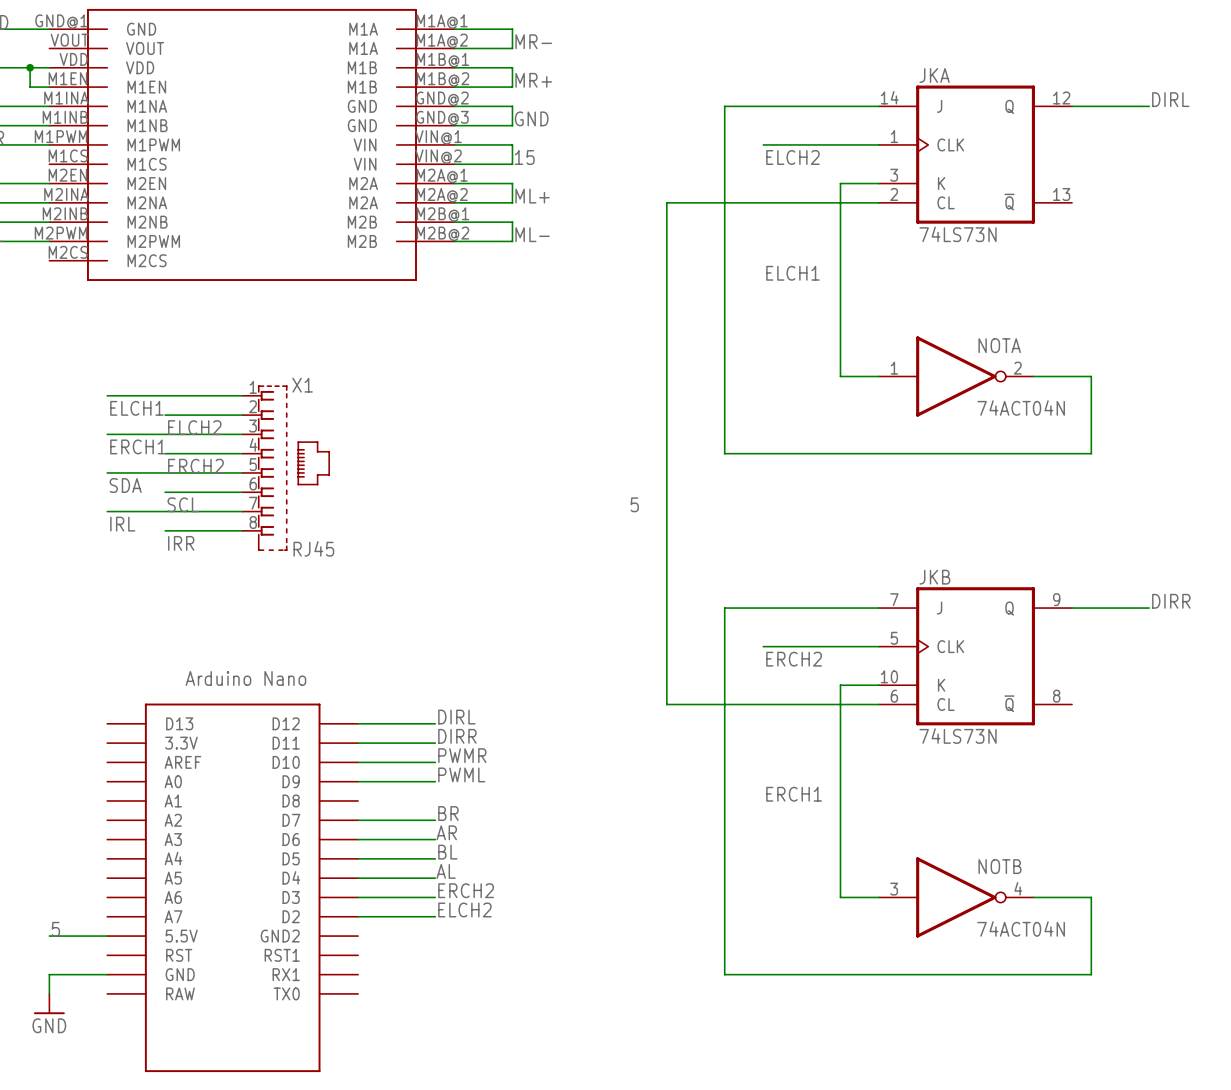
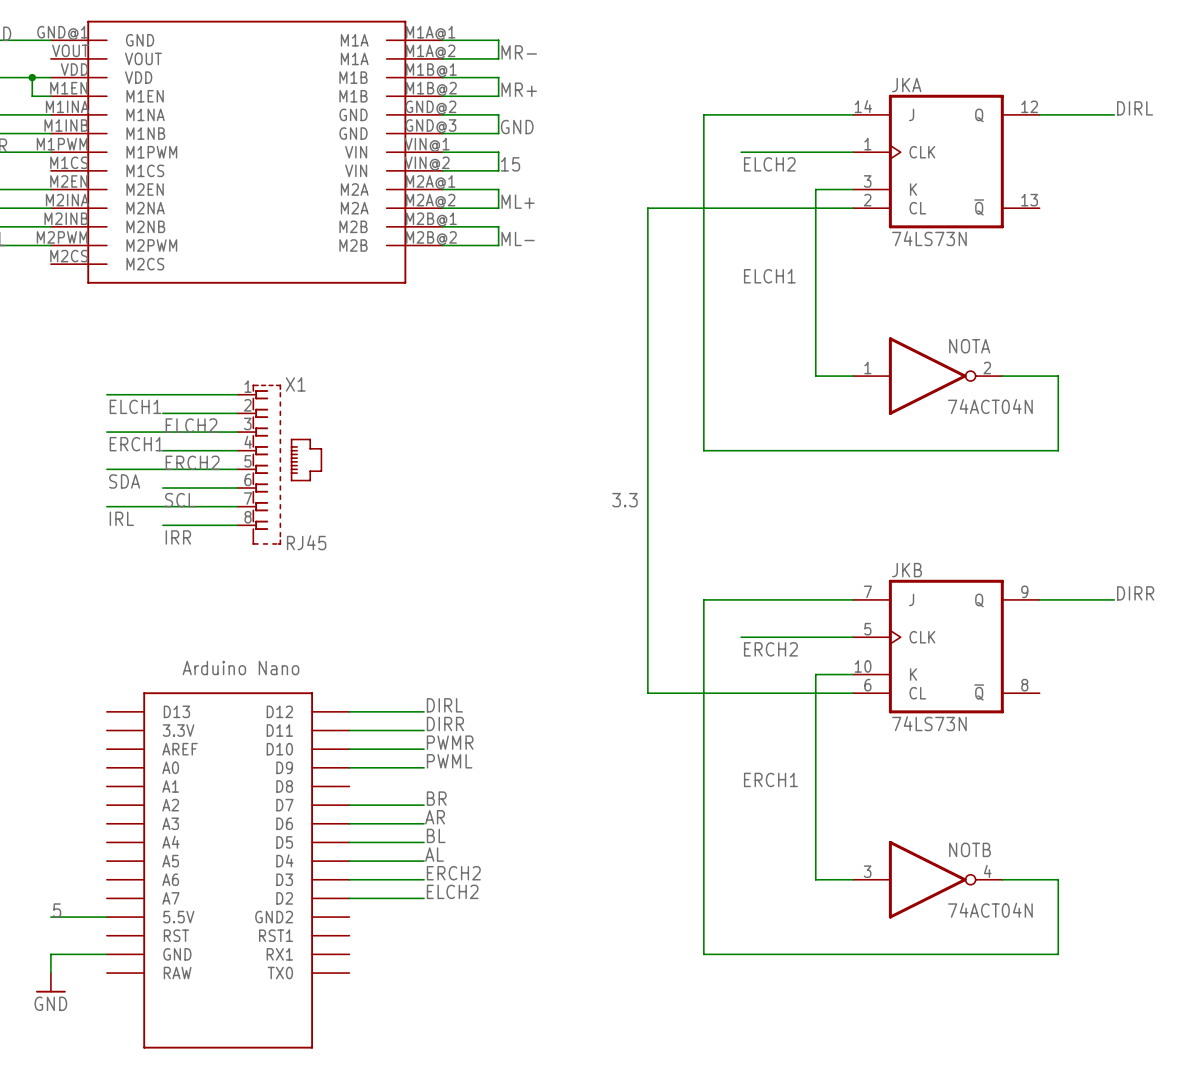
label: 5 (634, 504) -> 3.3 (624, 500)

